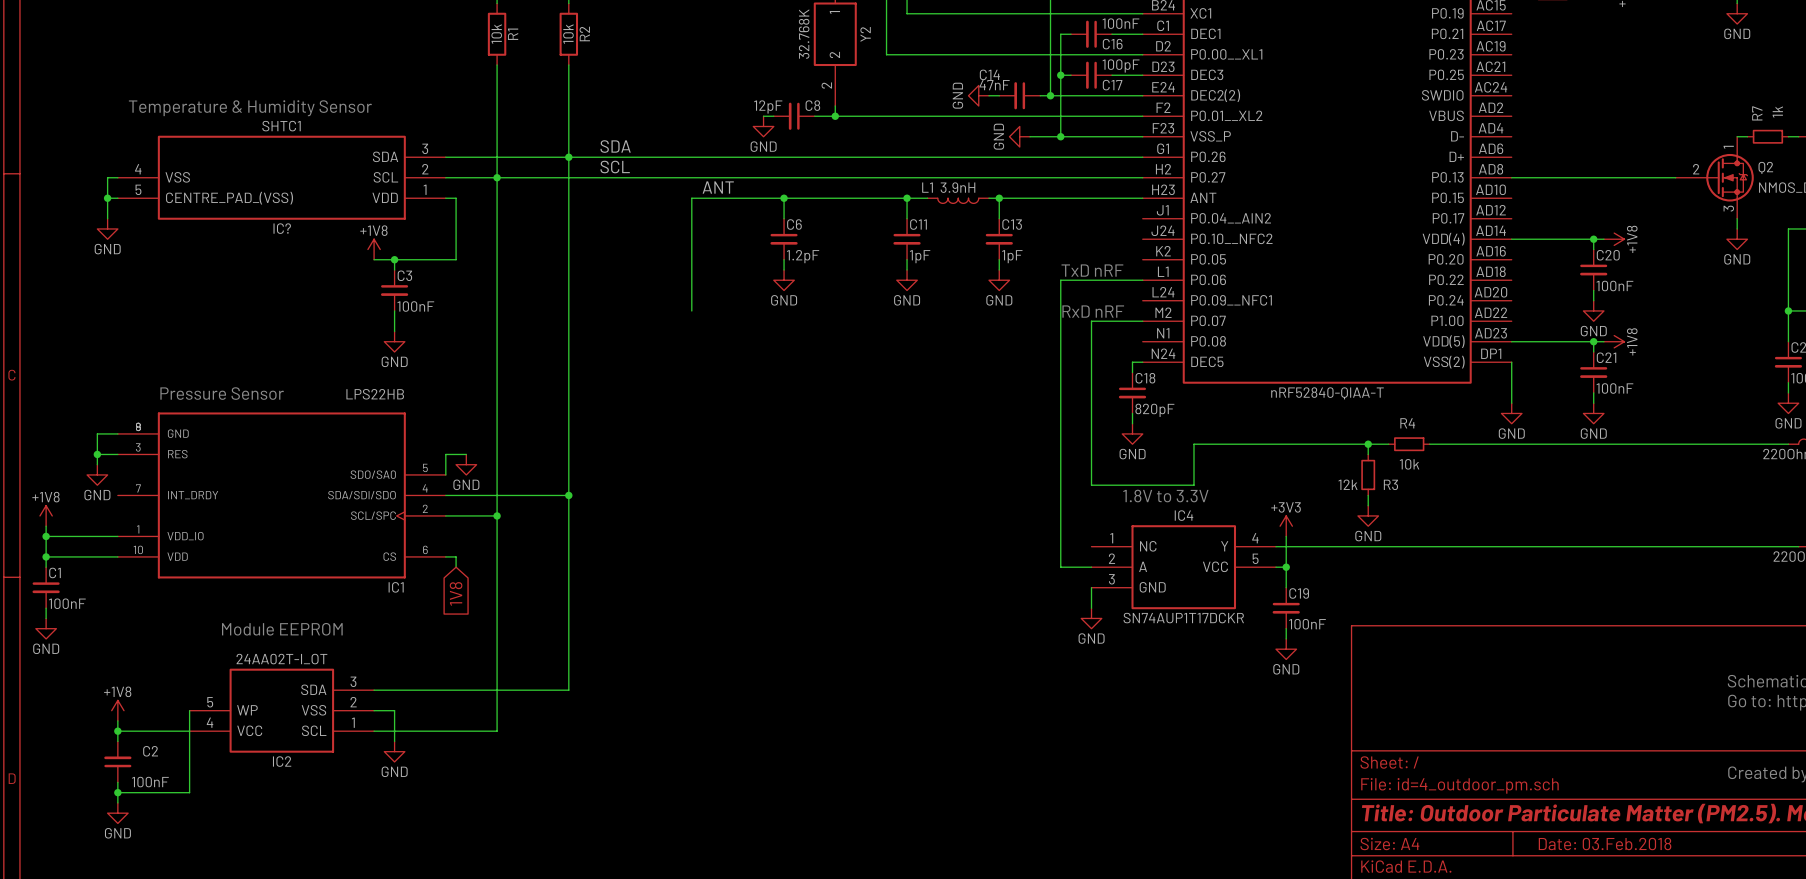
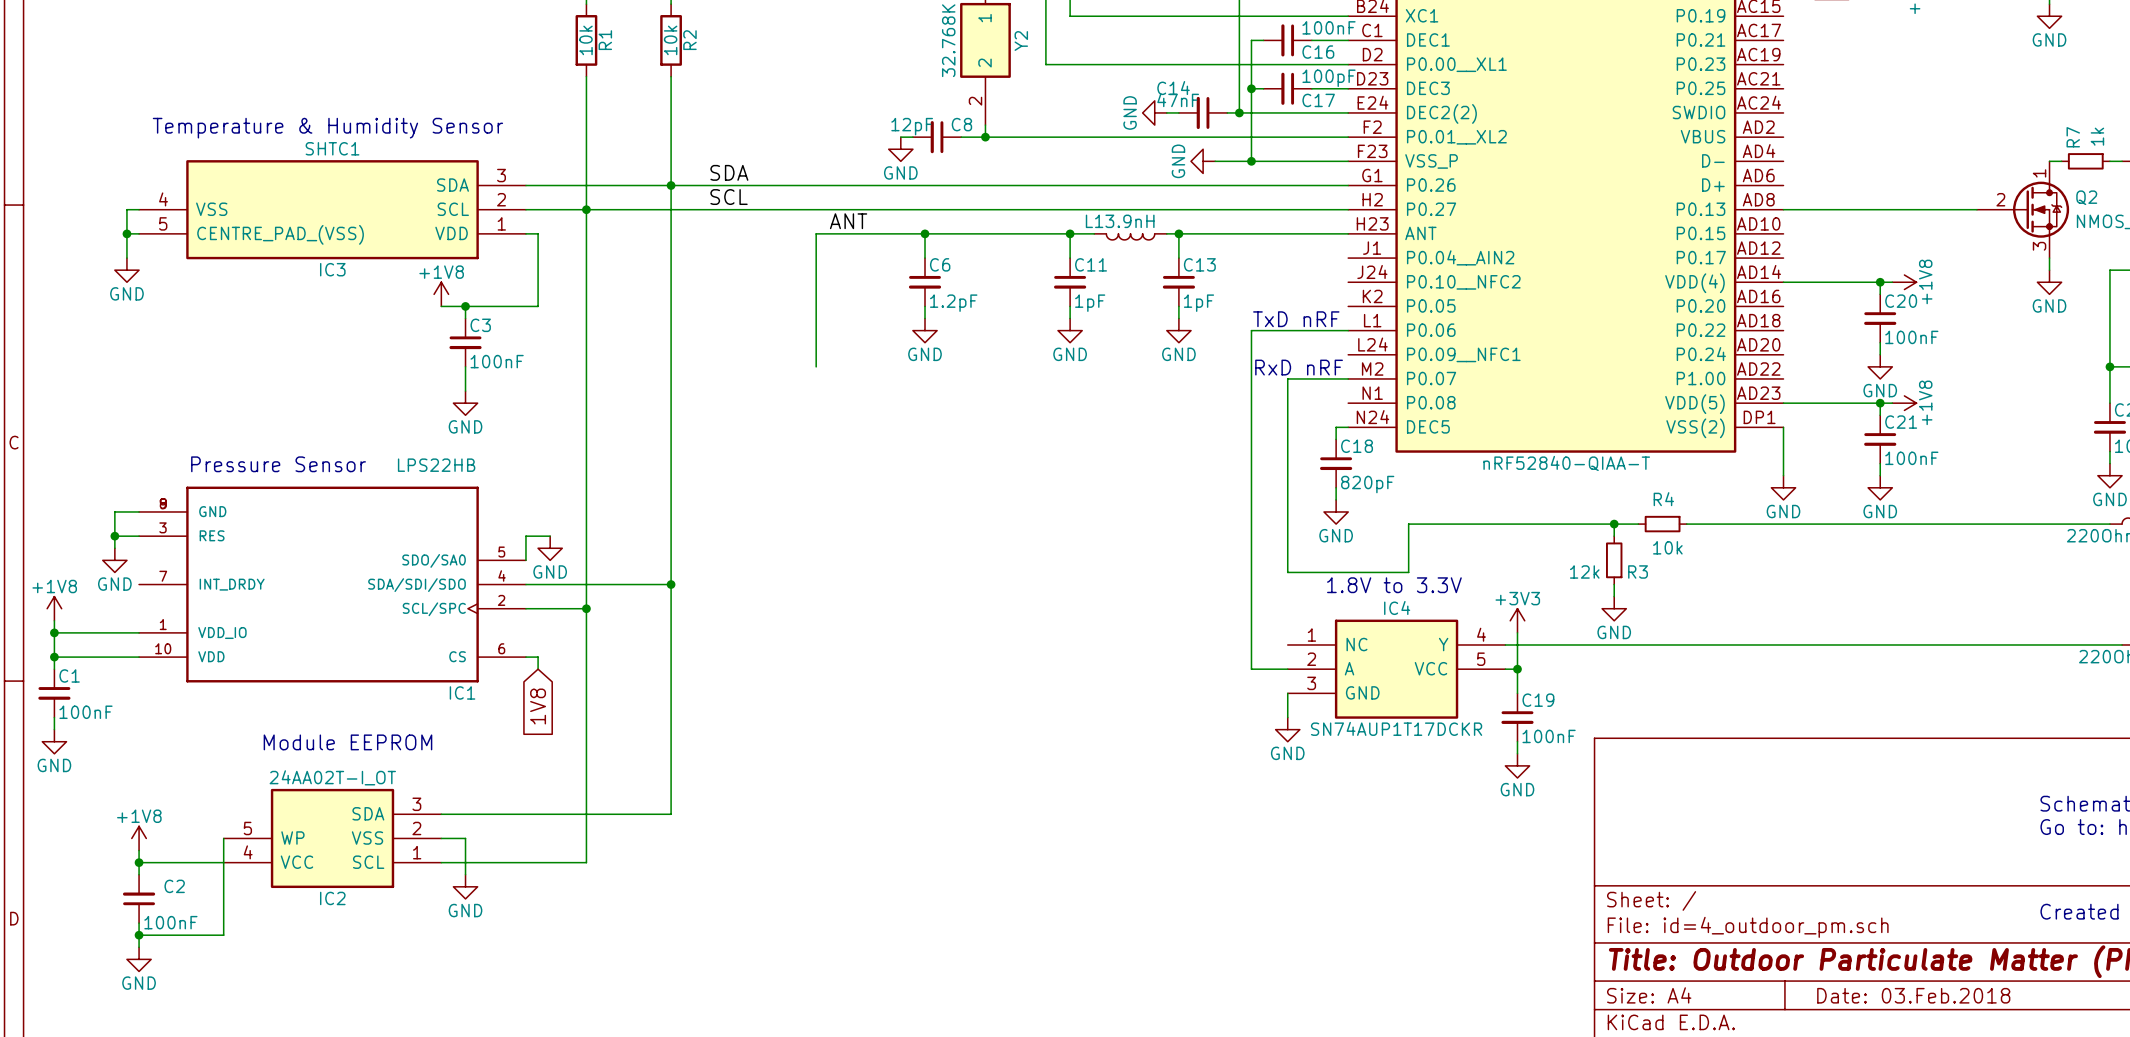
IC? name: IC? (282, 228) -> IC3 (332, 269)

